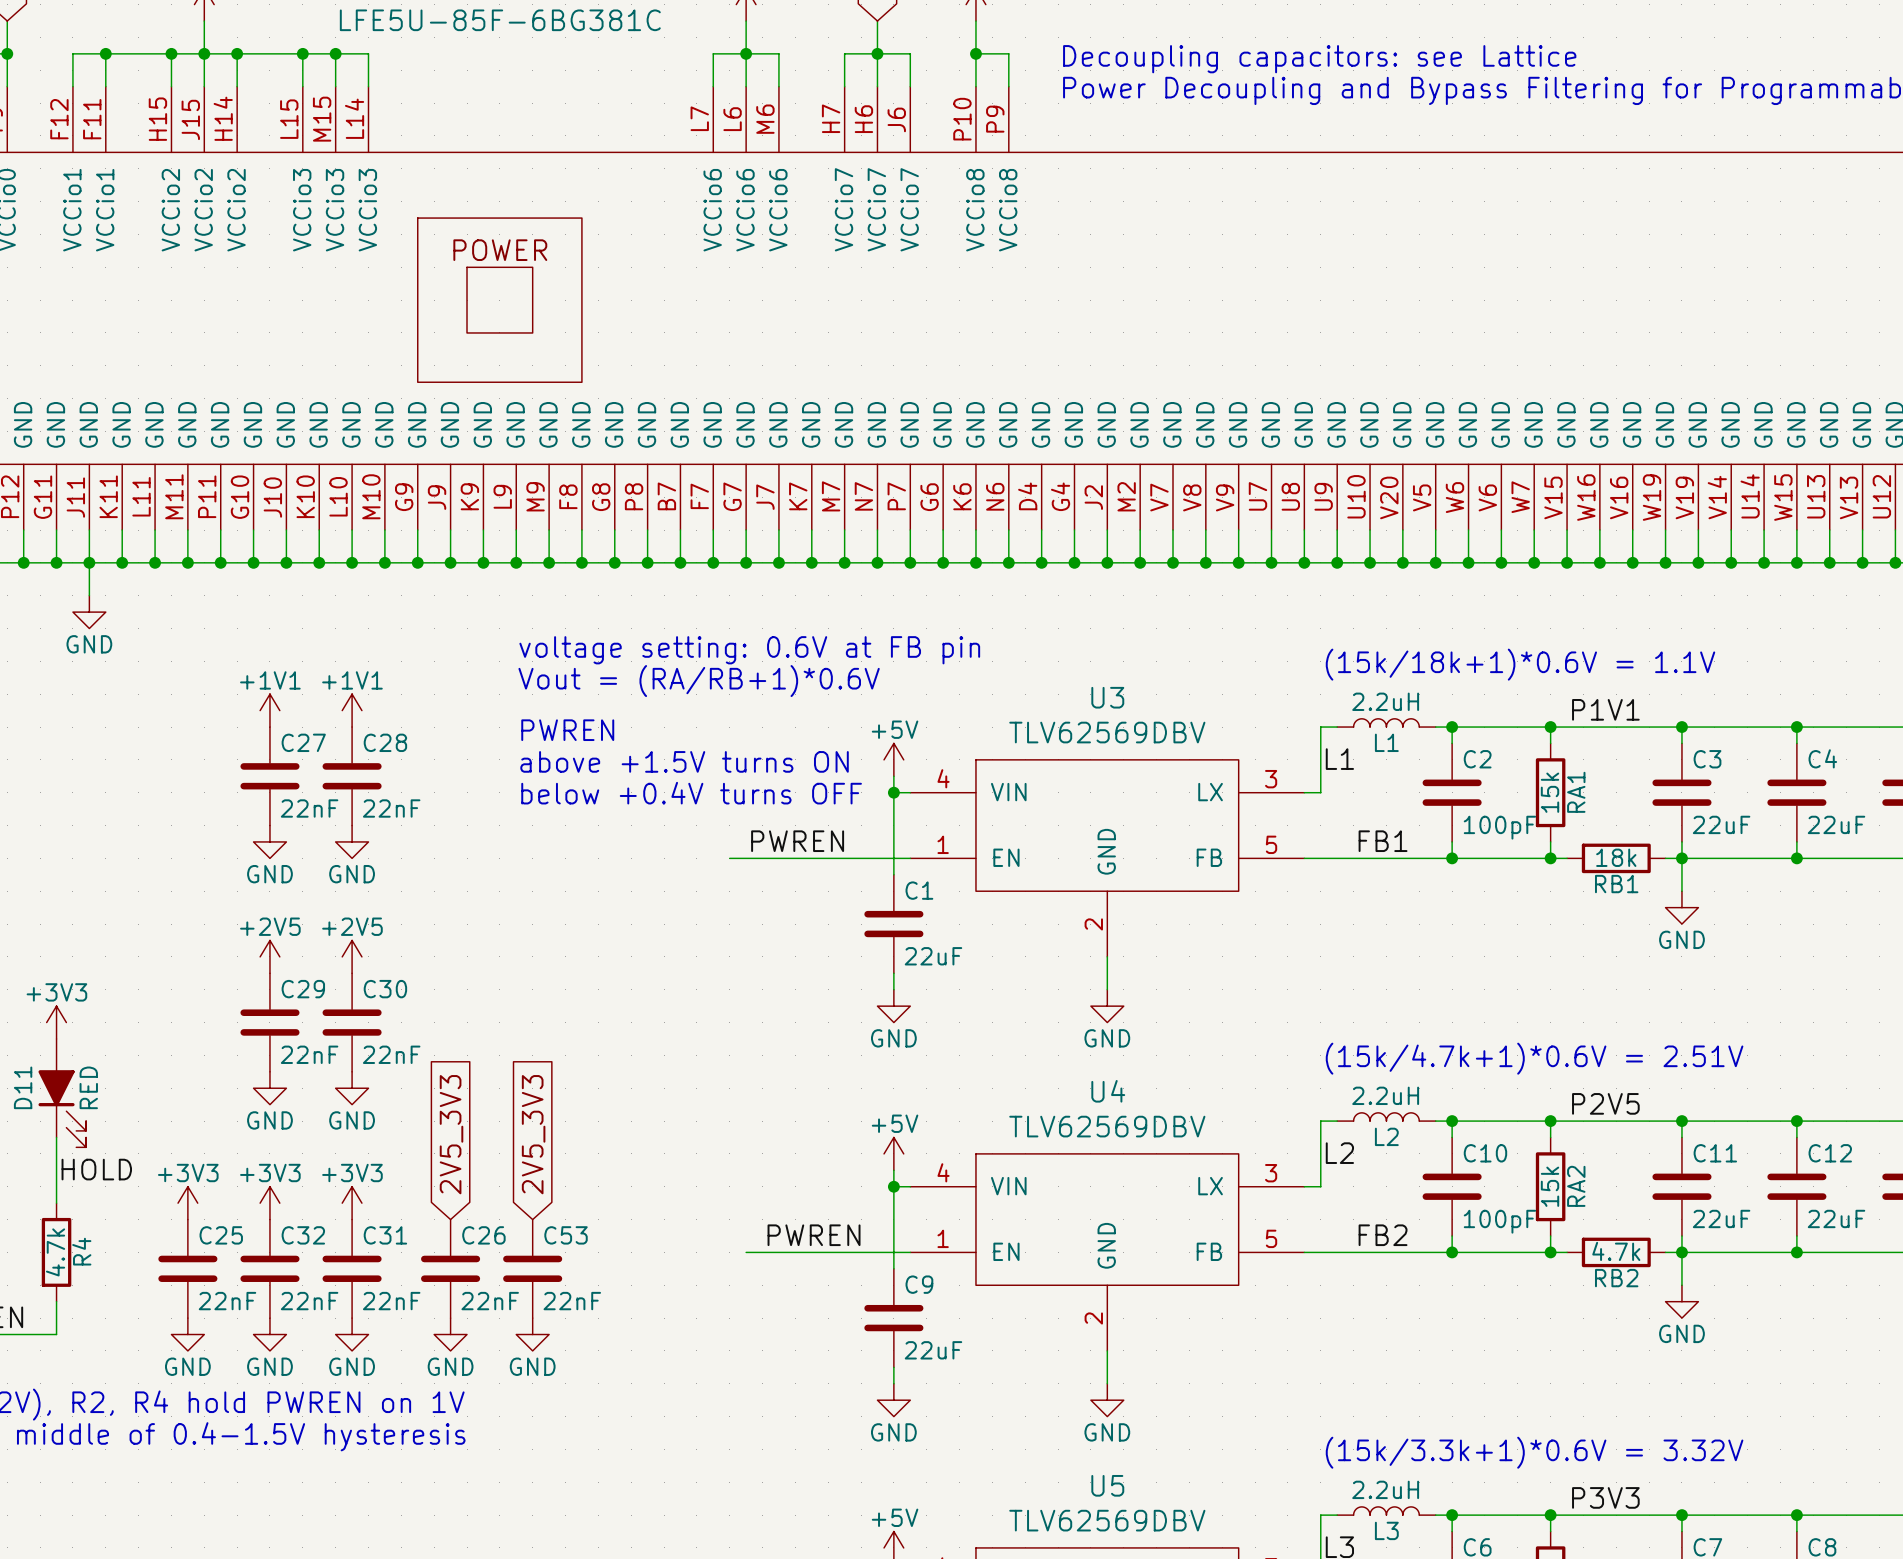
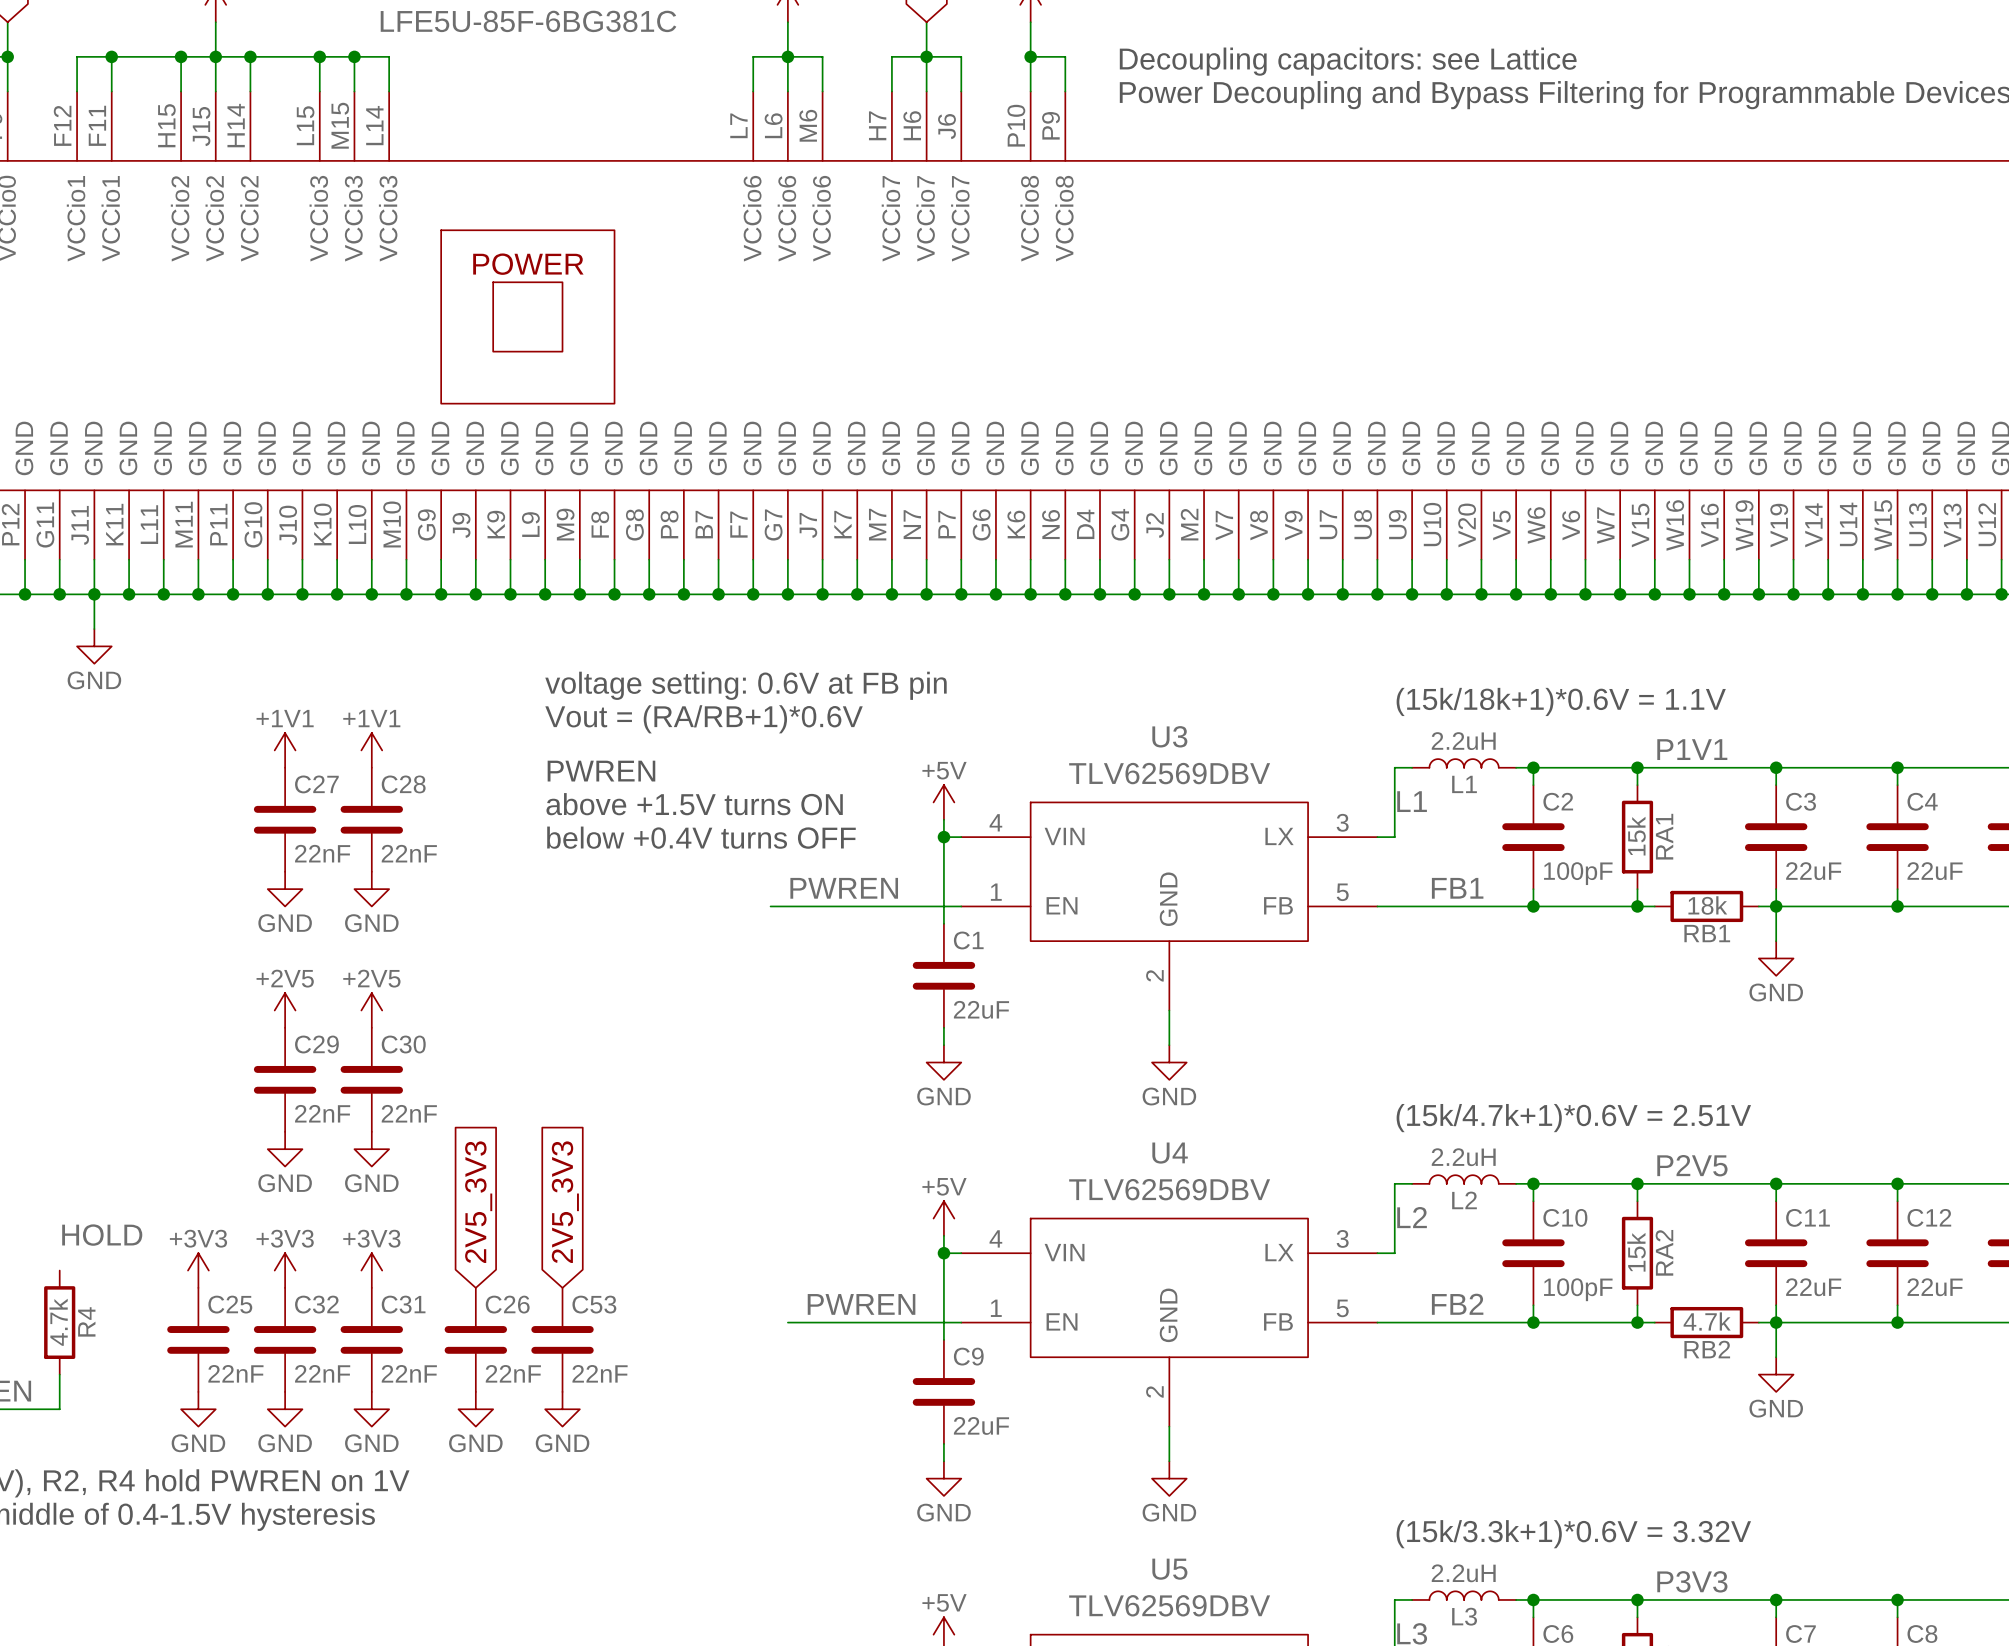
power symbol: +3V3 (56, 1022) -> none
D11: RED (62, 1093) -> none
wire: (56, 1137) (56, 1203) -> none

